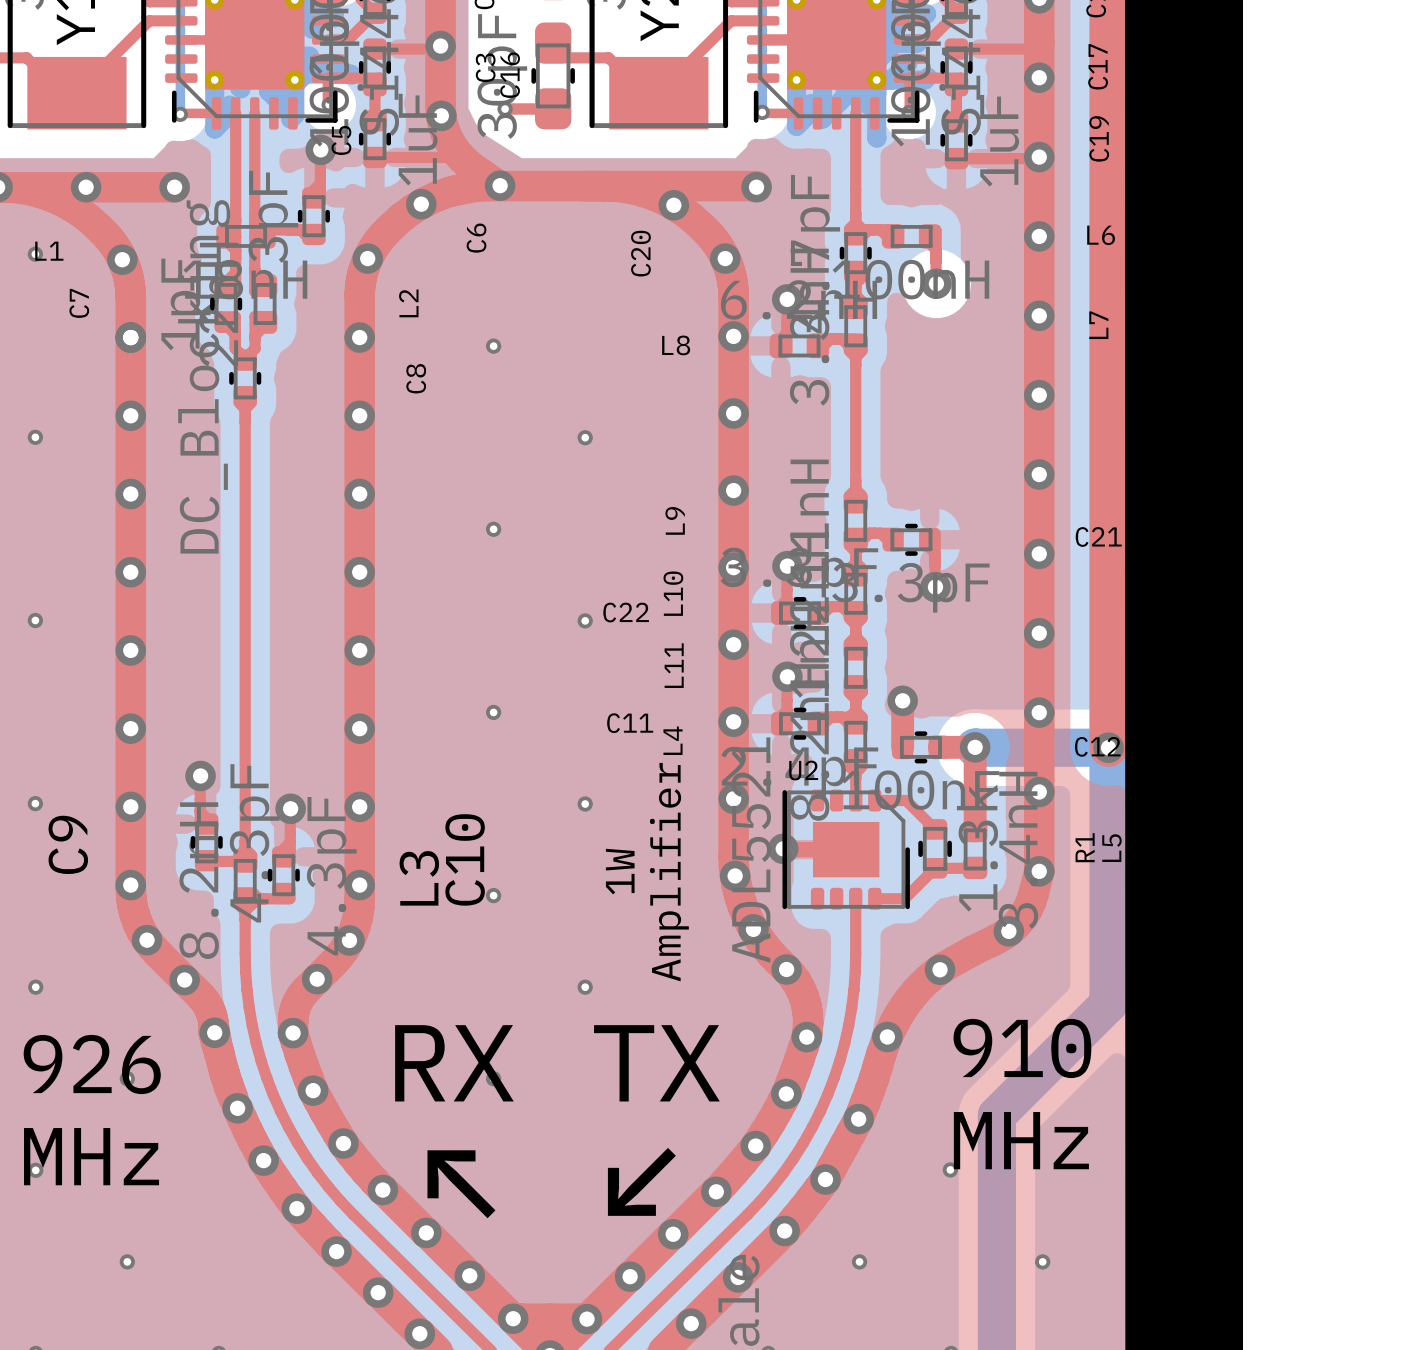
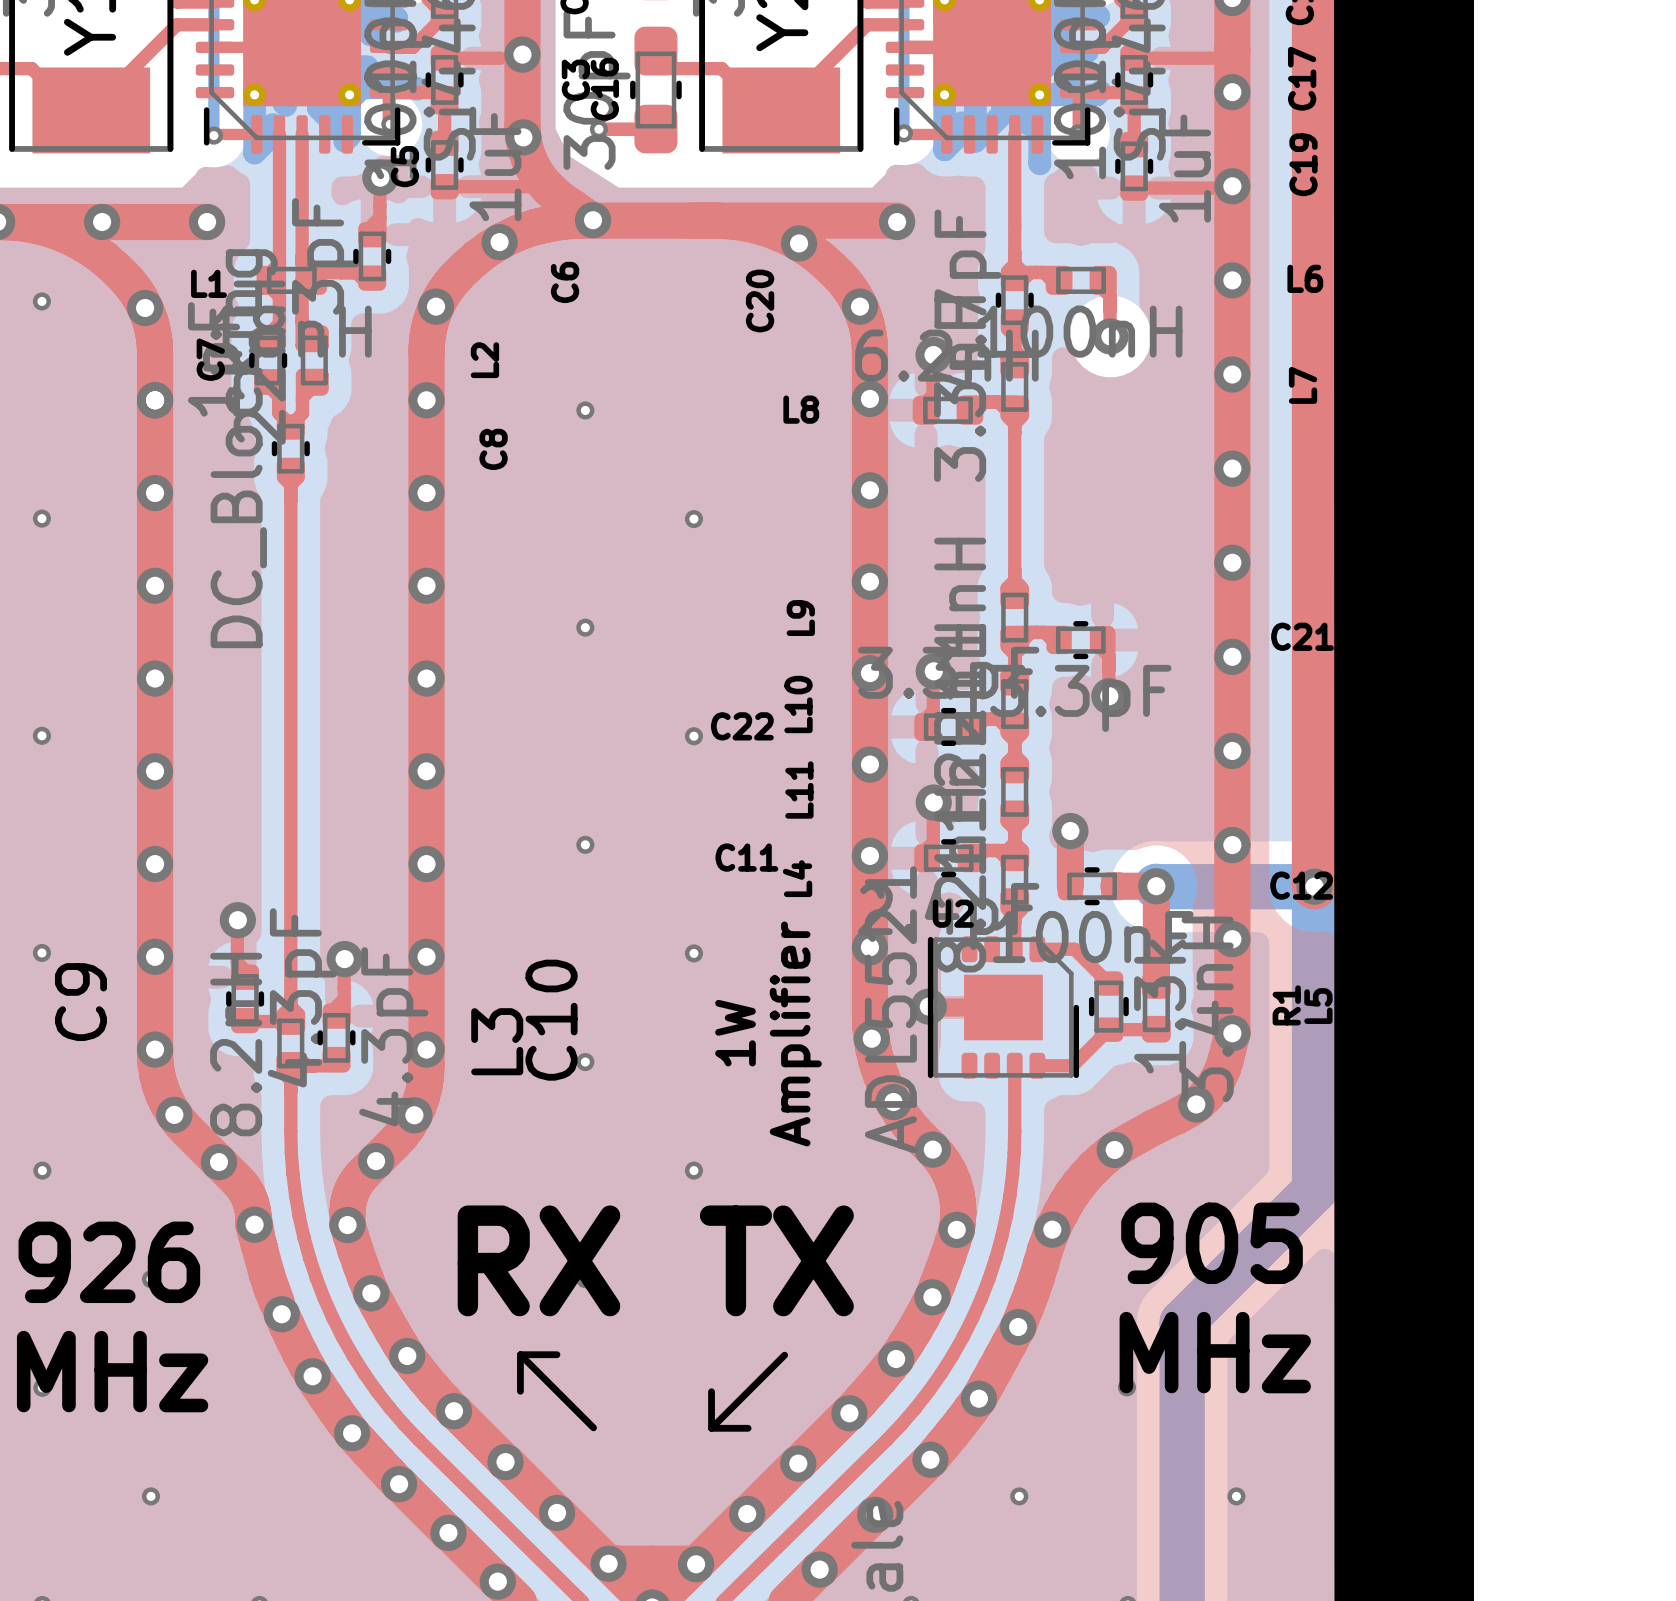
L1 name position: L1 (49, 251) -> L1 (208, 283)
C7 name position: C7 (79, 303) -> C7 (210, 359)
text: 910 (1022, 1048) -> 905 (1212, 1243)

